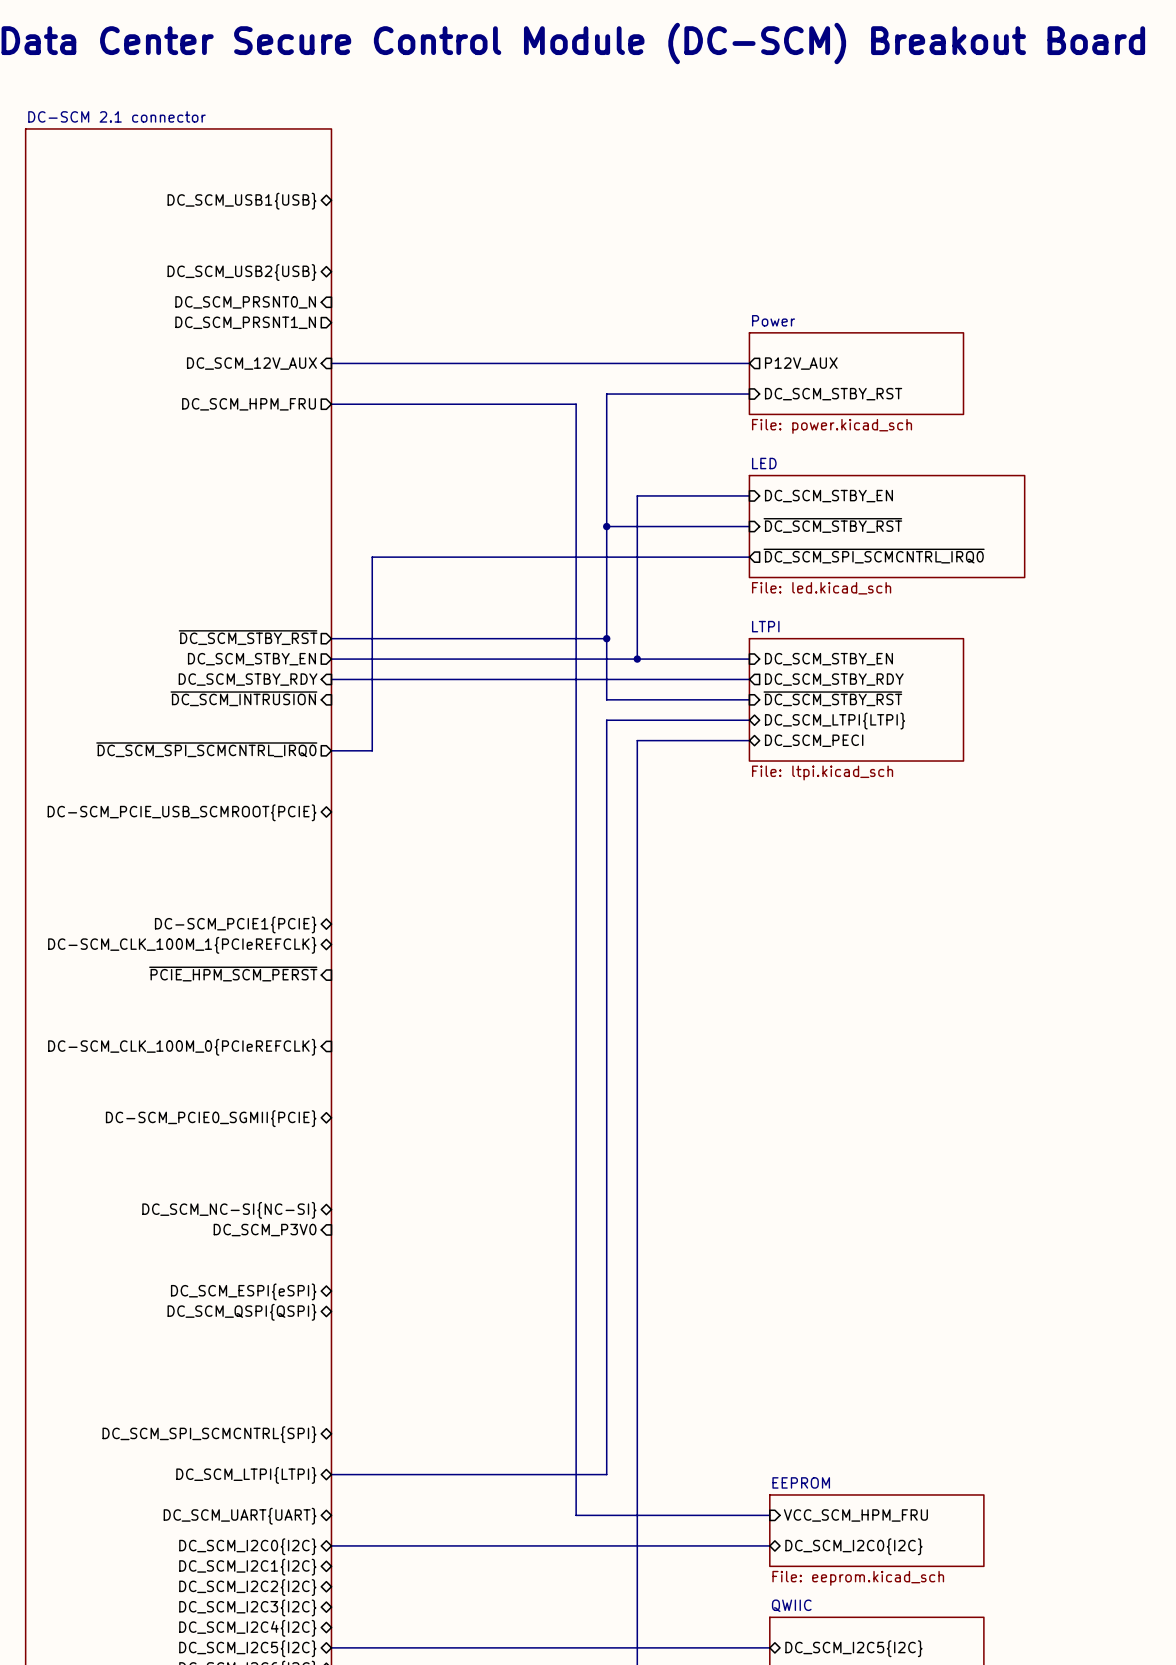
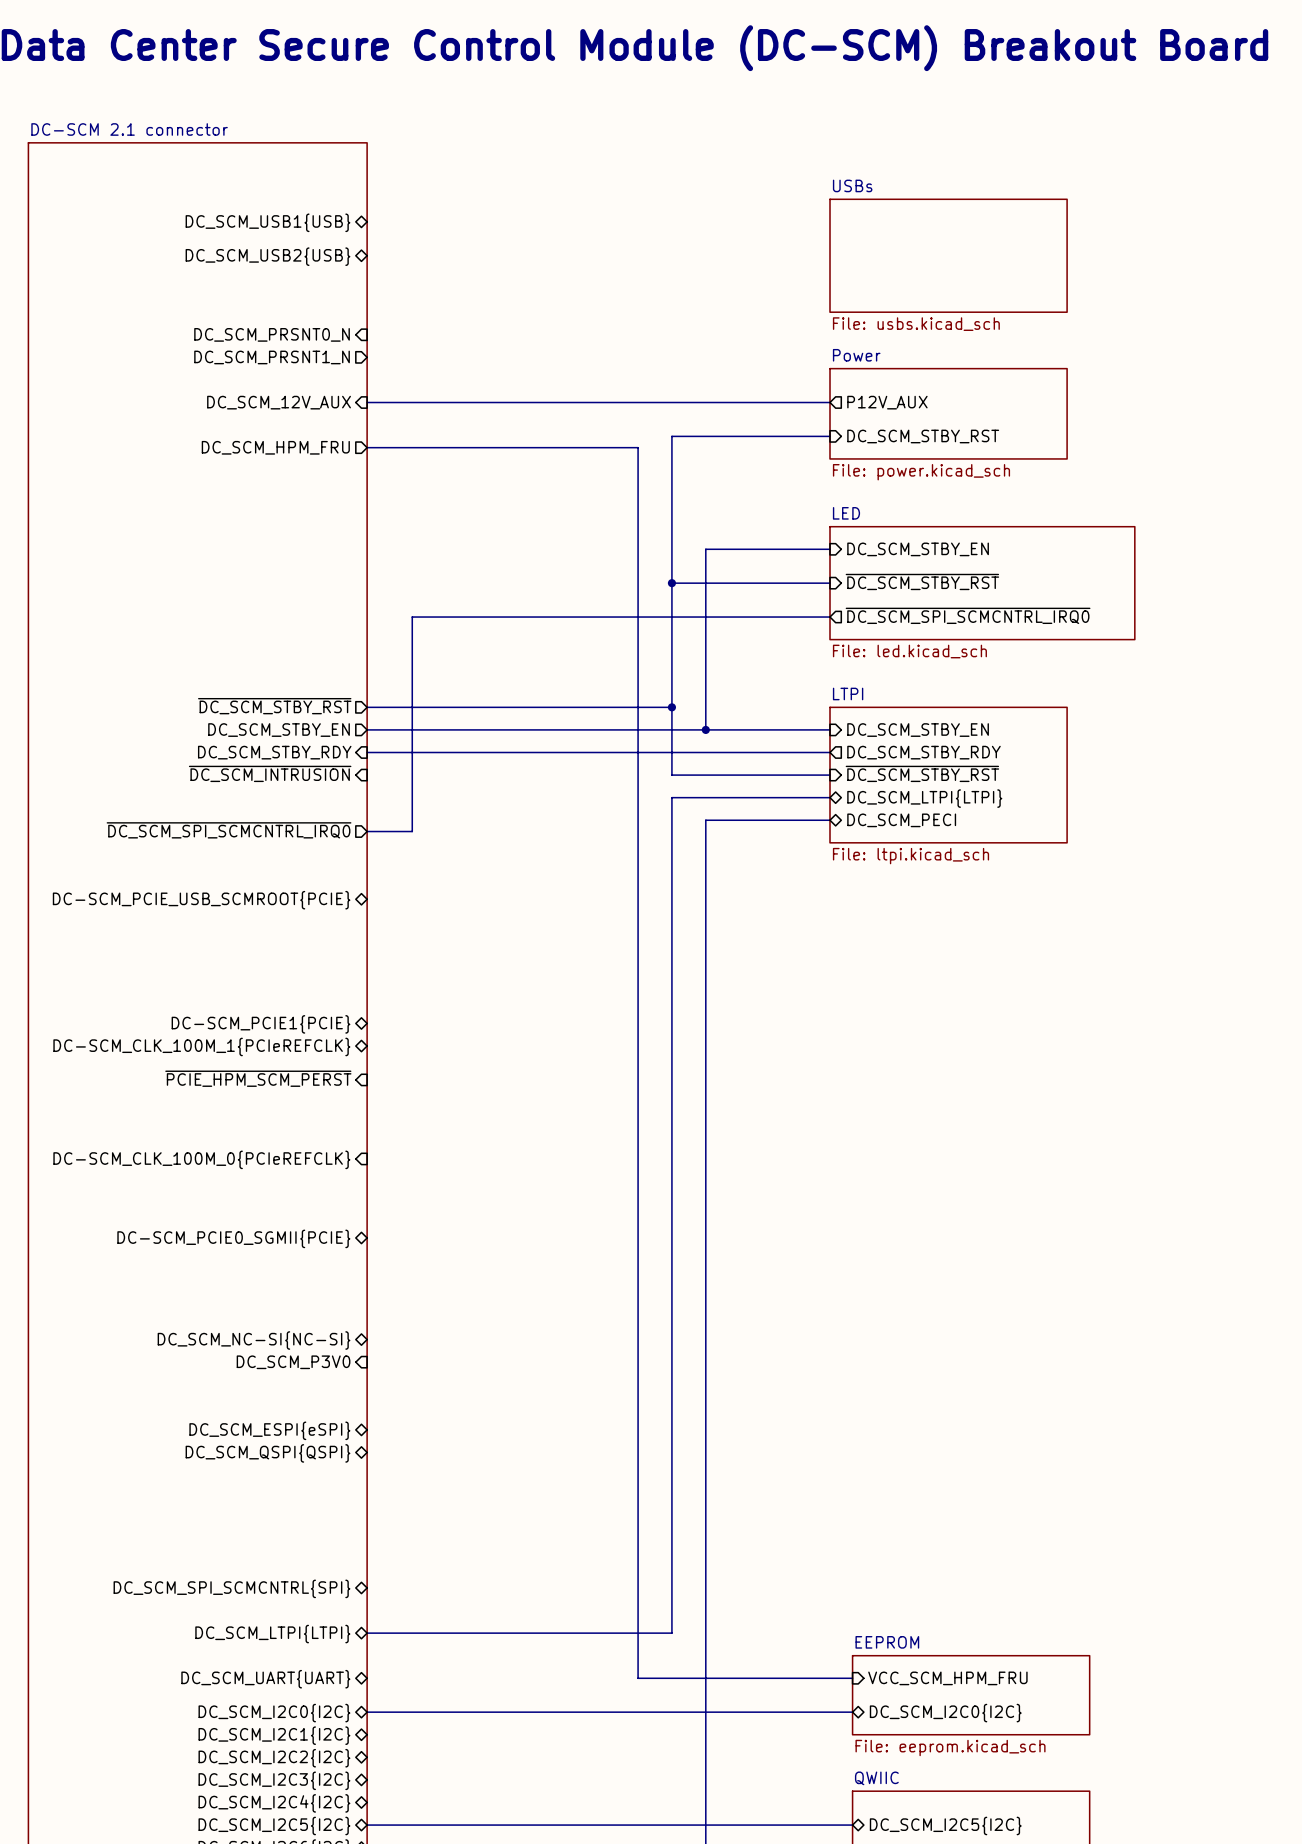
sheet USBs: none -> File: usbs.kicad_sch (948, 255)
sheet pin position: DC_SCM_USB2{USB} (241, 272) -> DC_SCM_USB2{USB} (268, 256)

